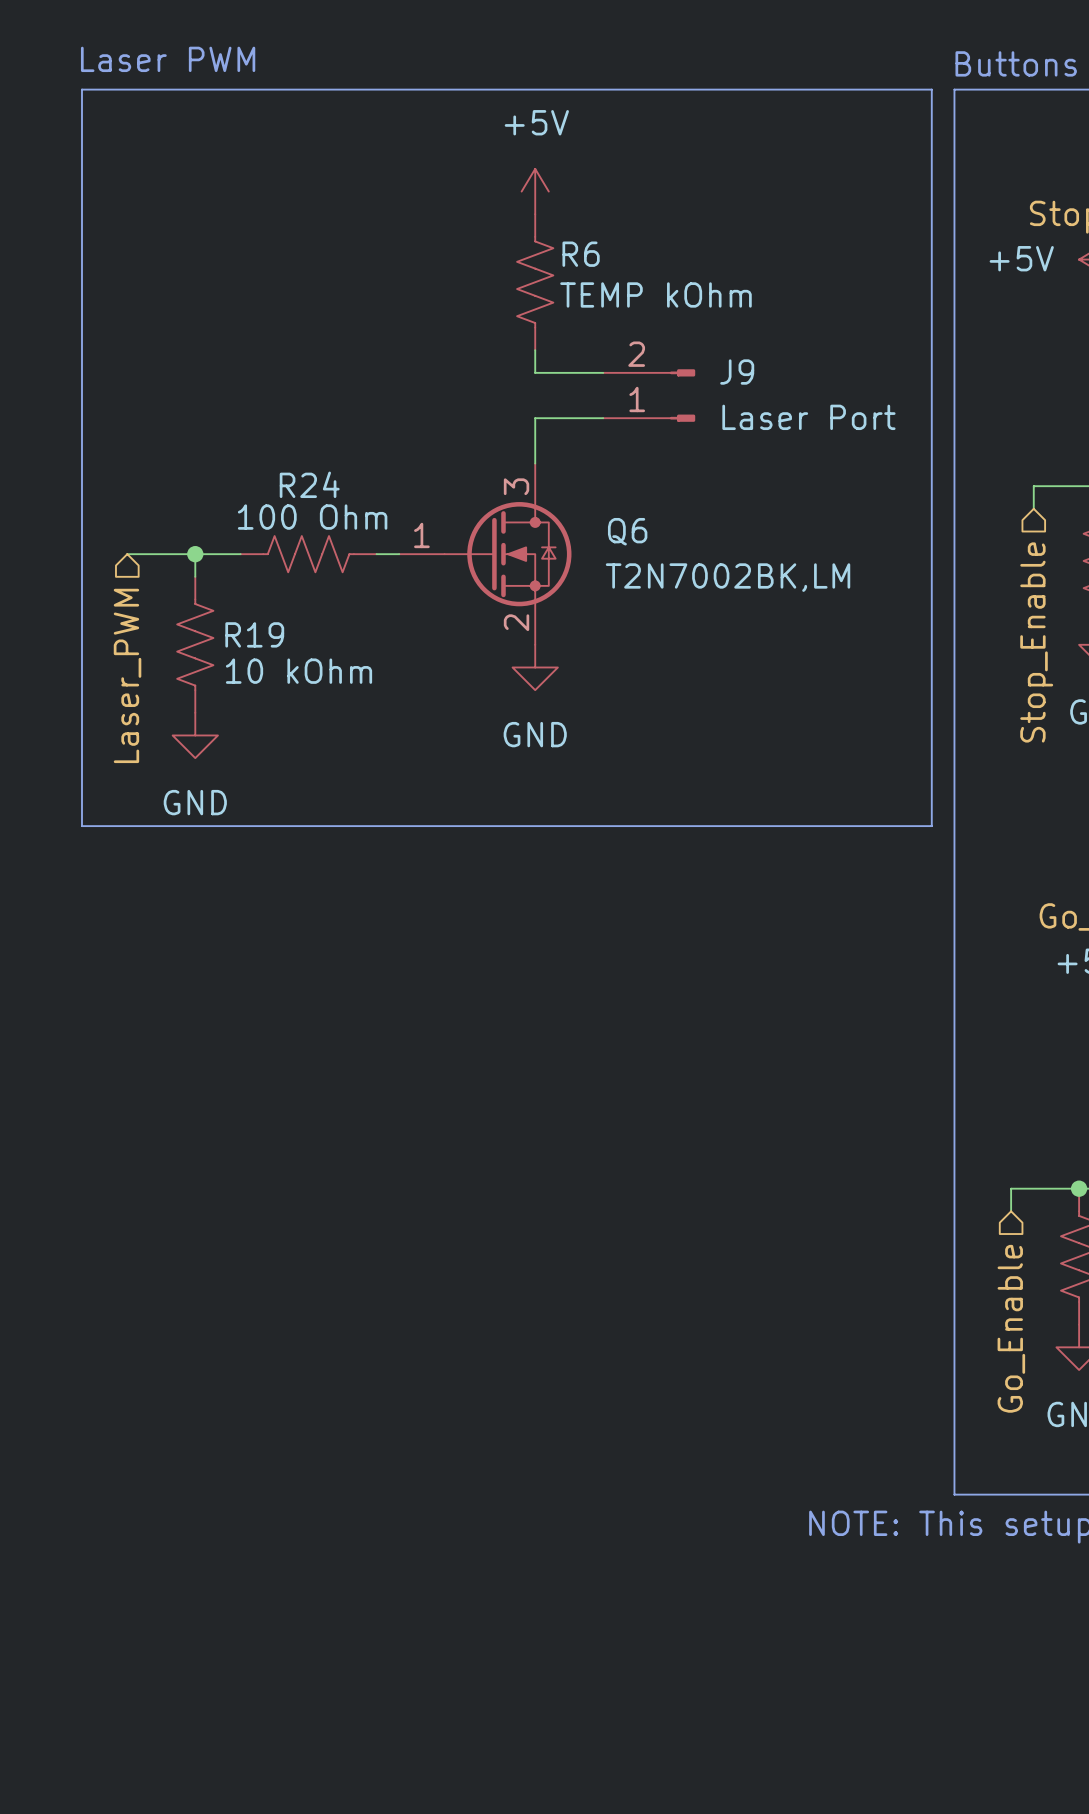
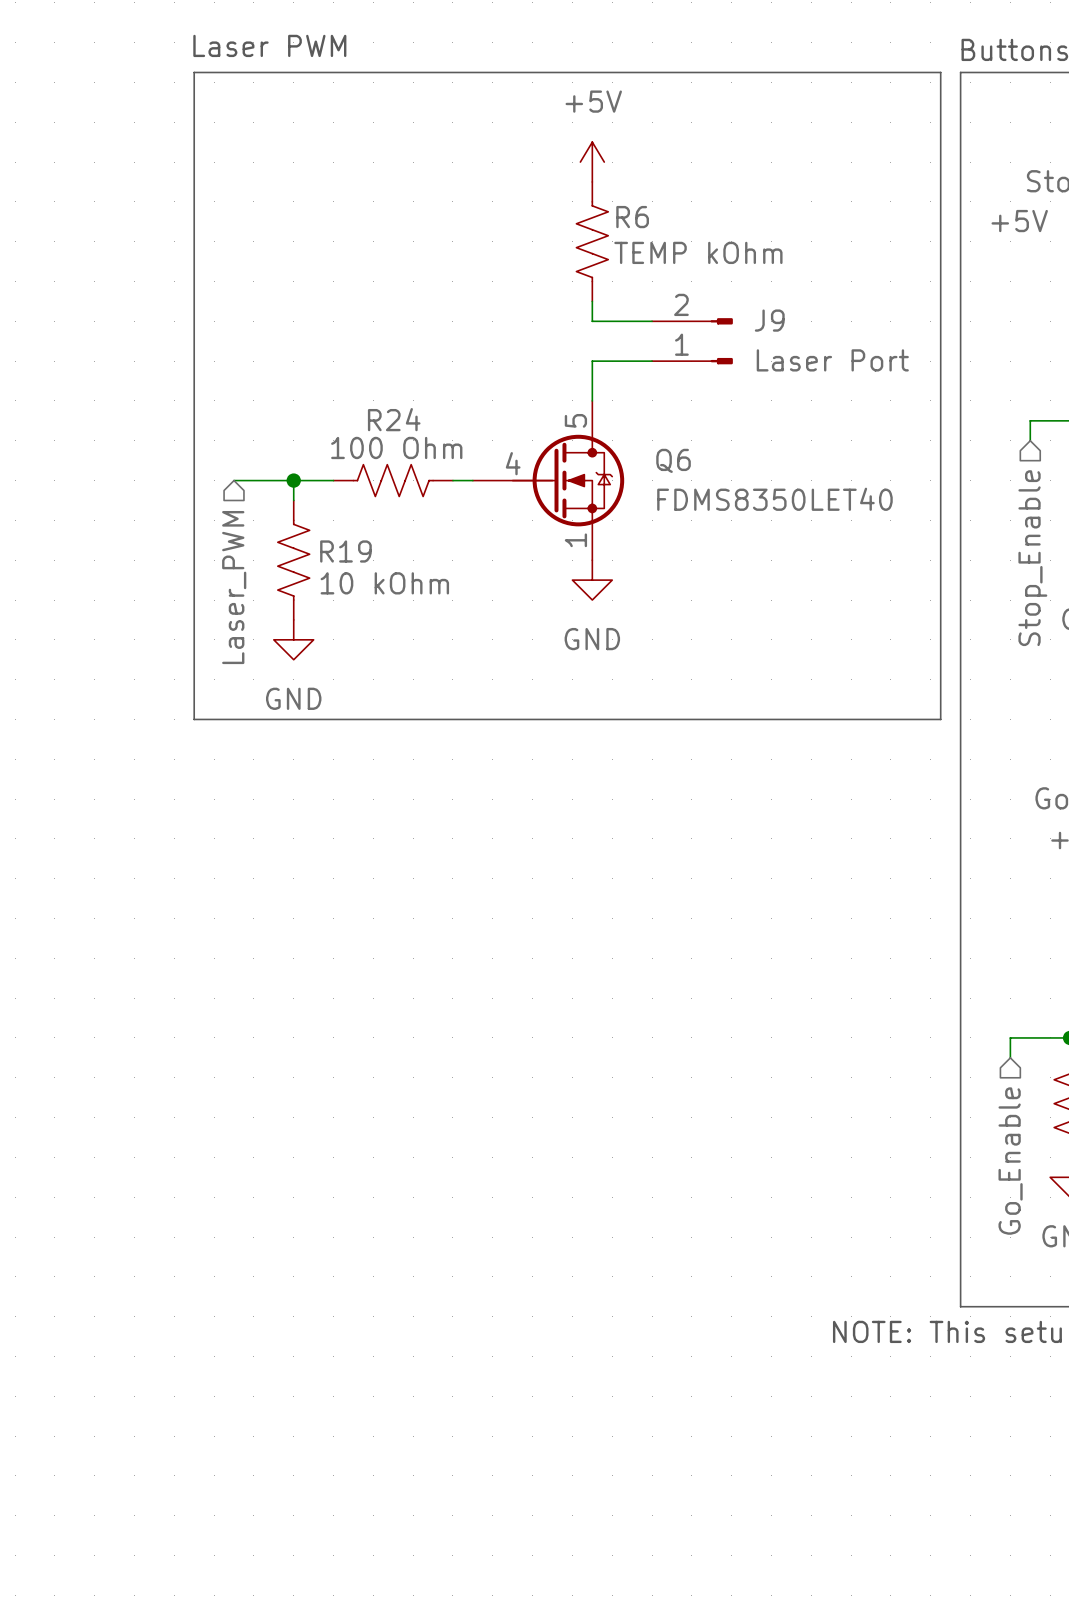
Q6 symbol: [399, 463, 572, 645] -> [472, 400, 625, 561]
Q6 value: T2N7002BK,LM (728, 577) -> FDMS8350LET40 (774, 499)

